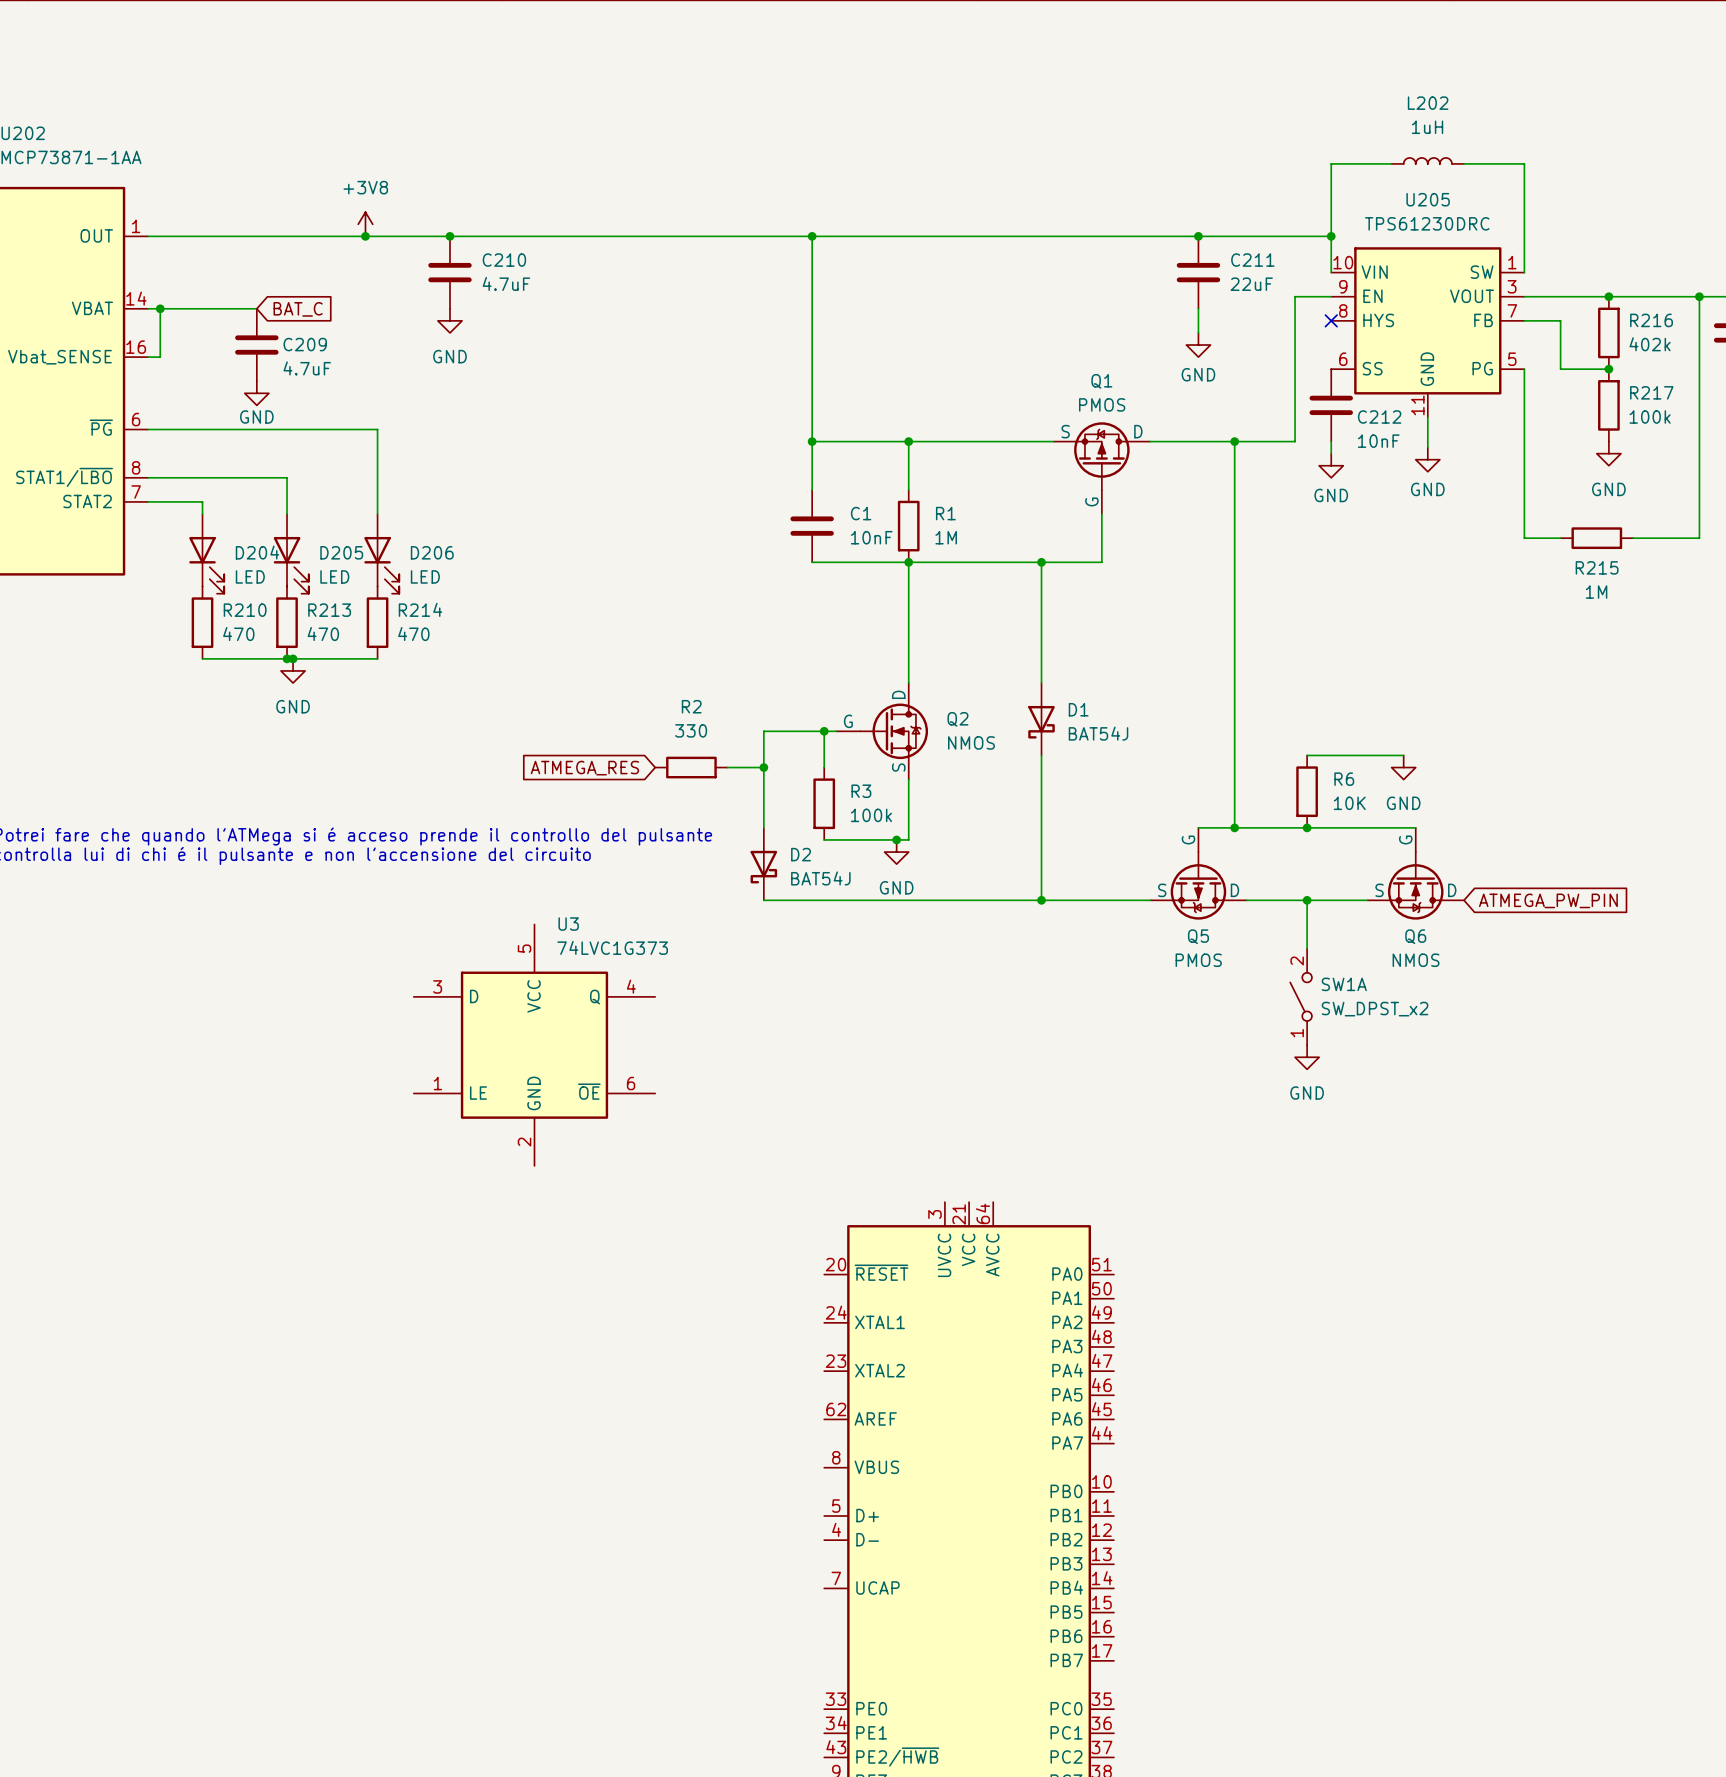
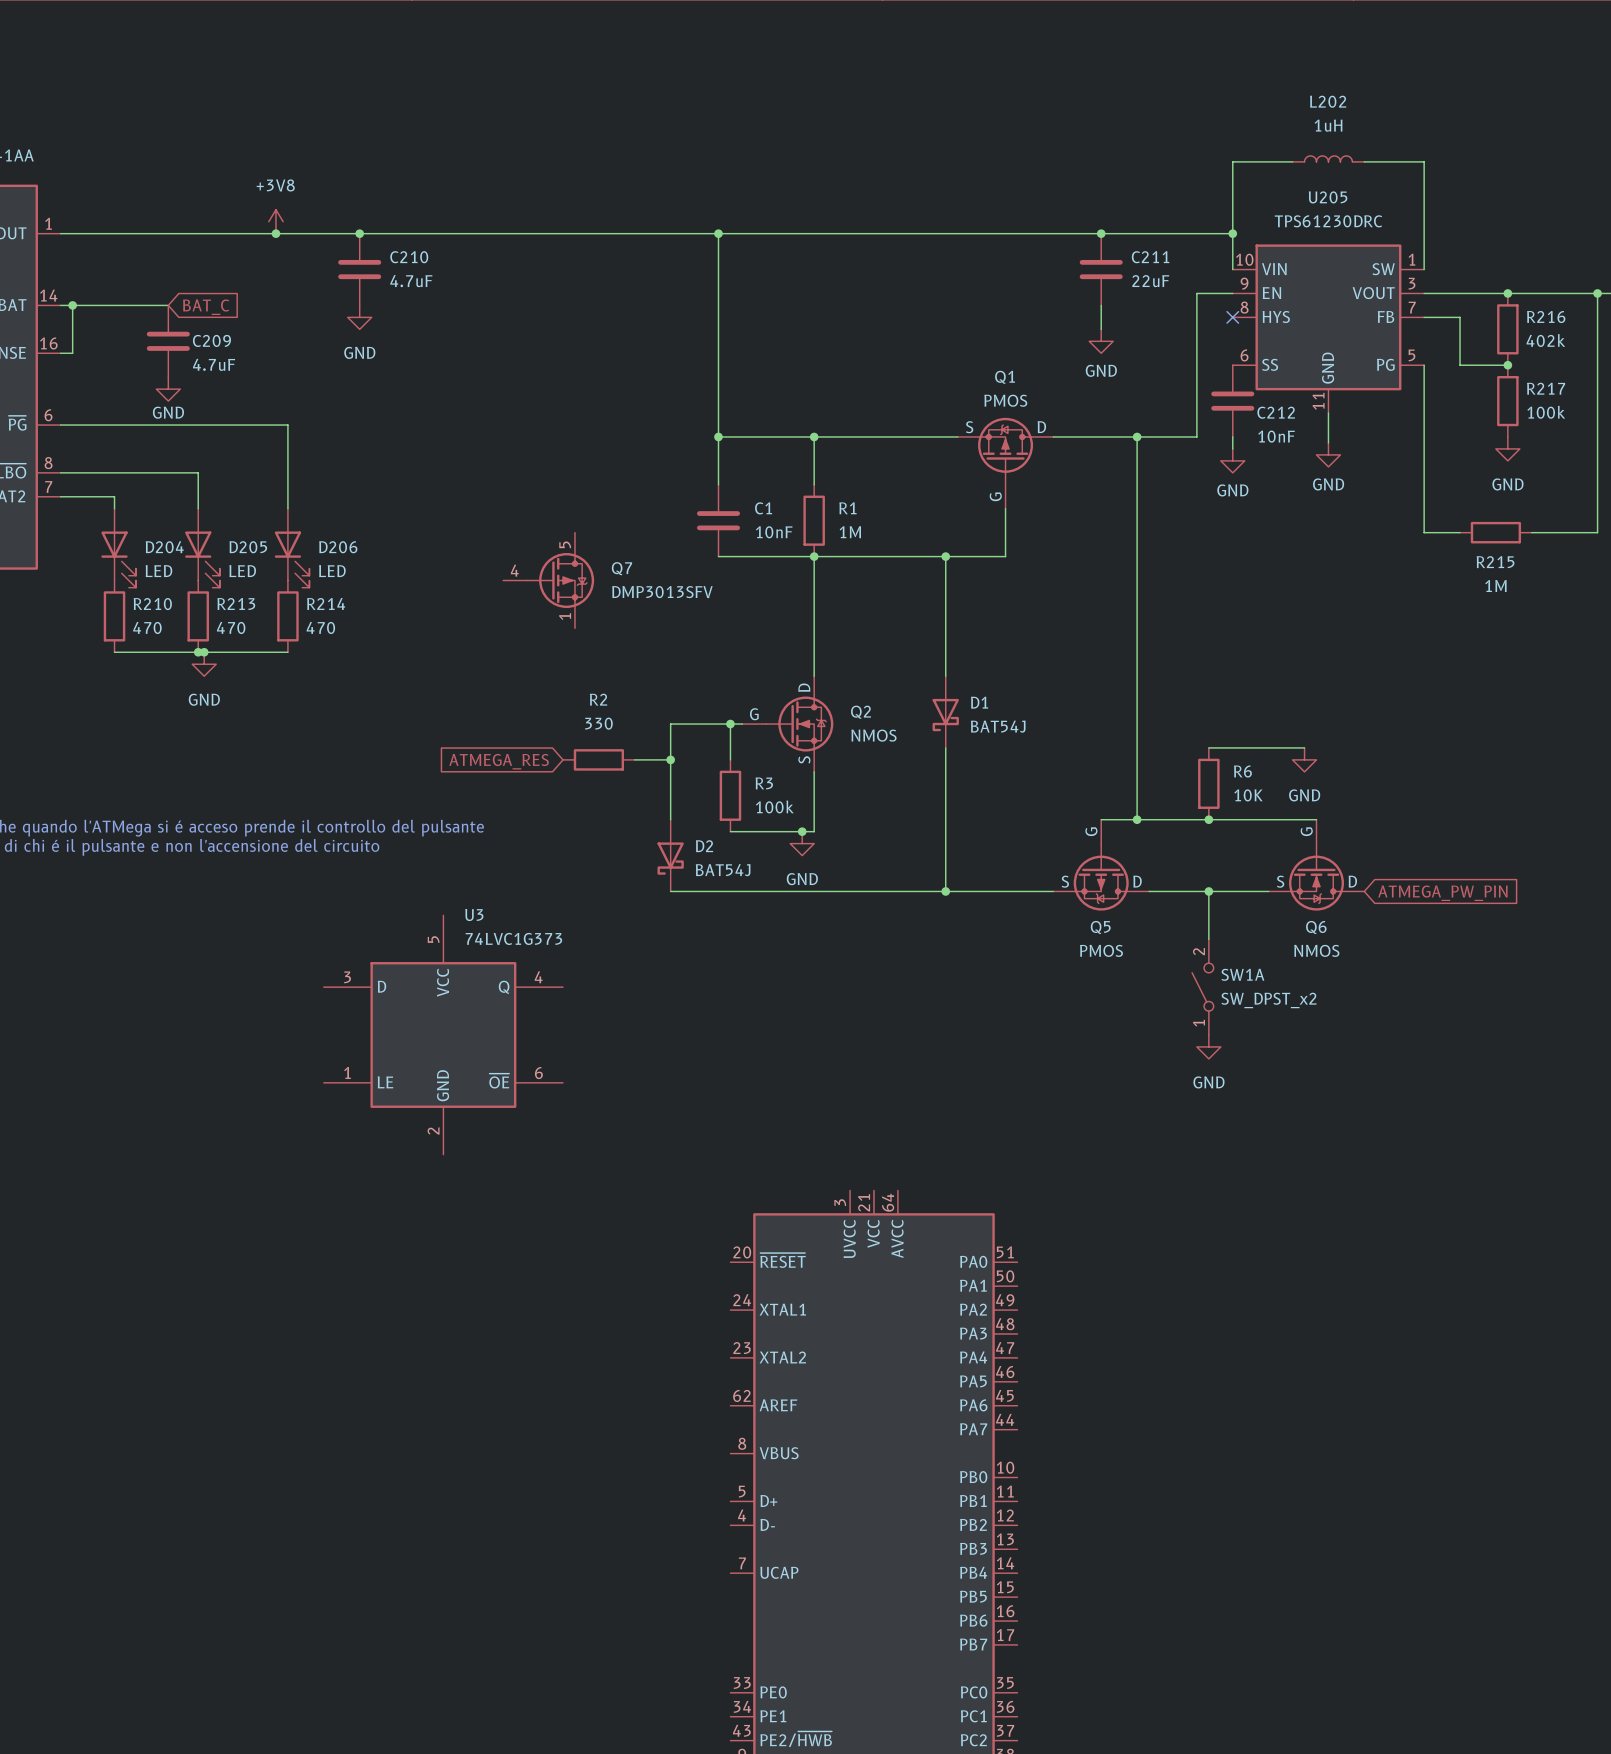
Q7: none -> DMP3013SFV (548, 580)

